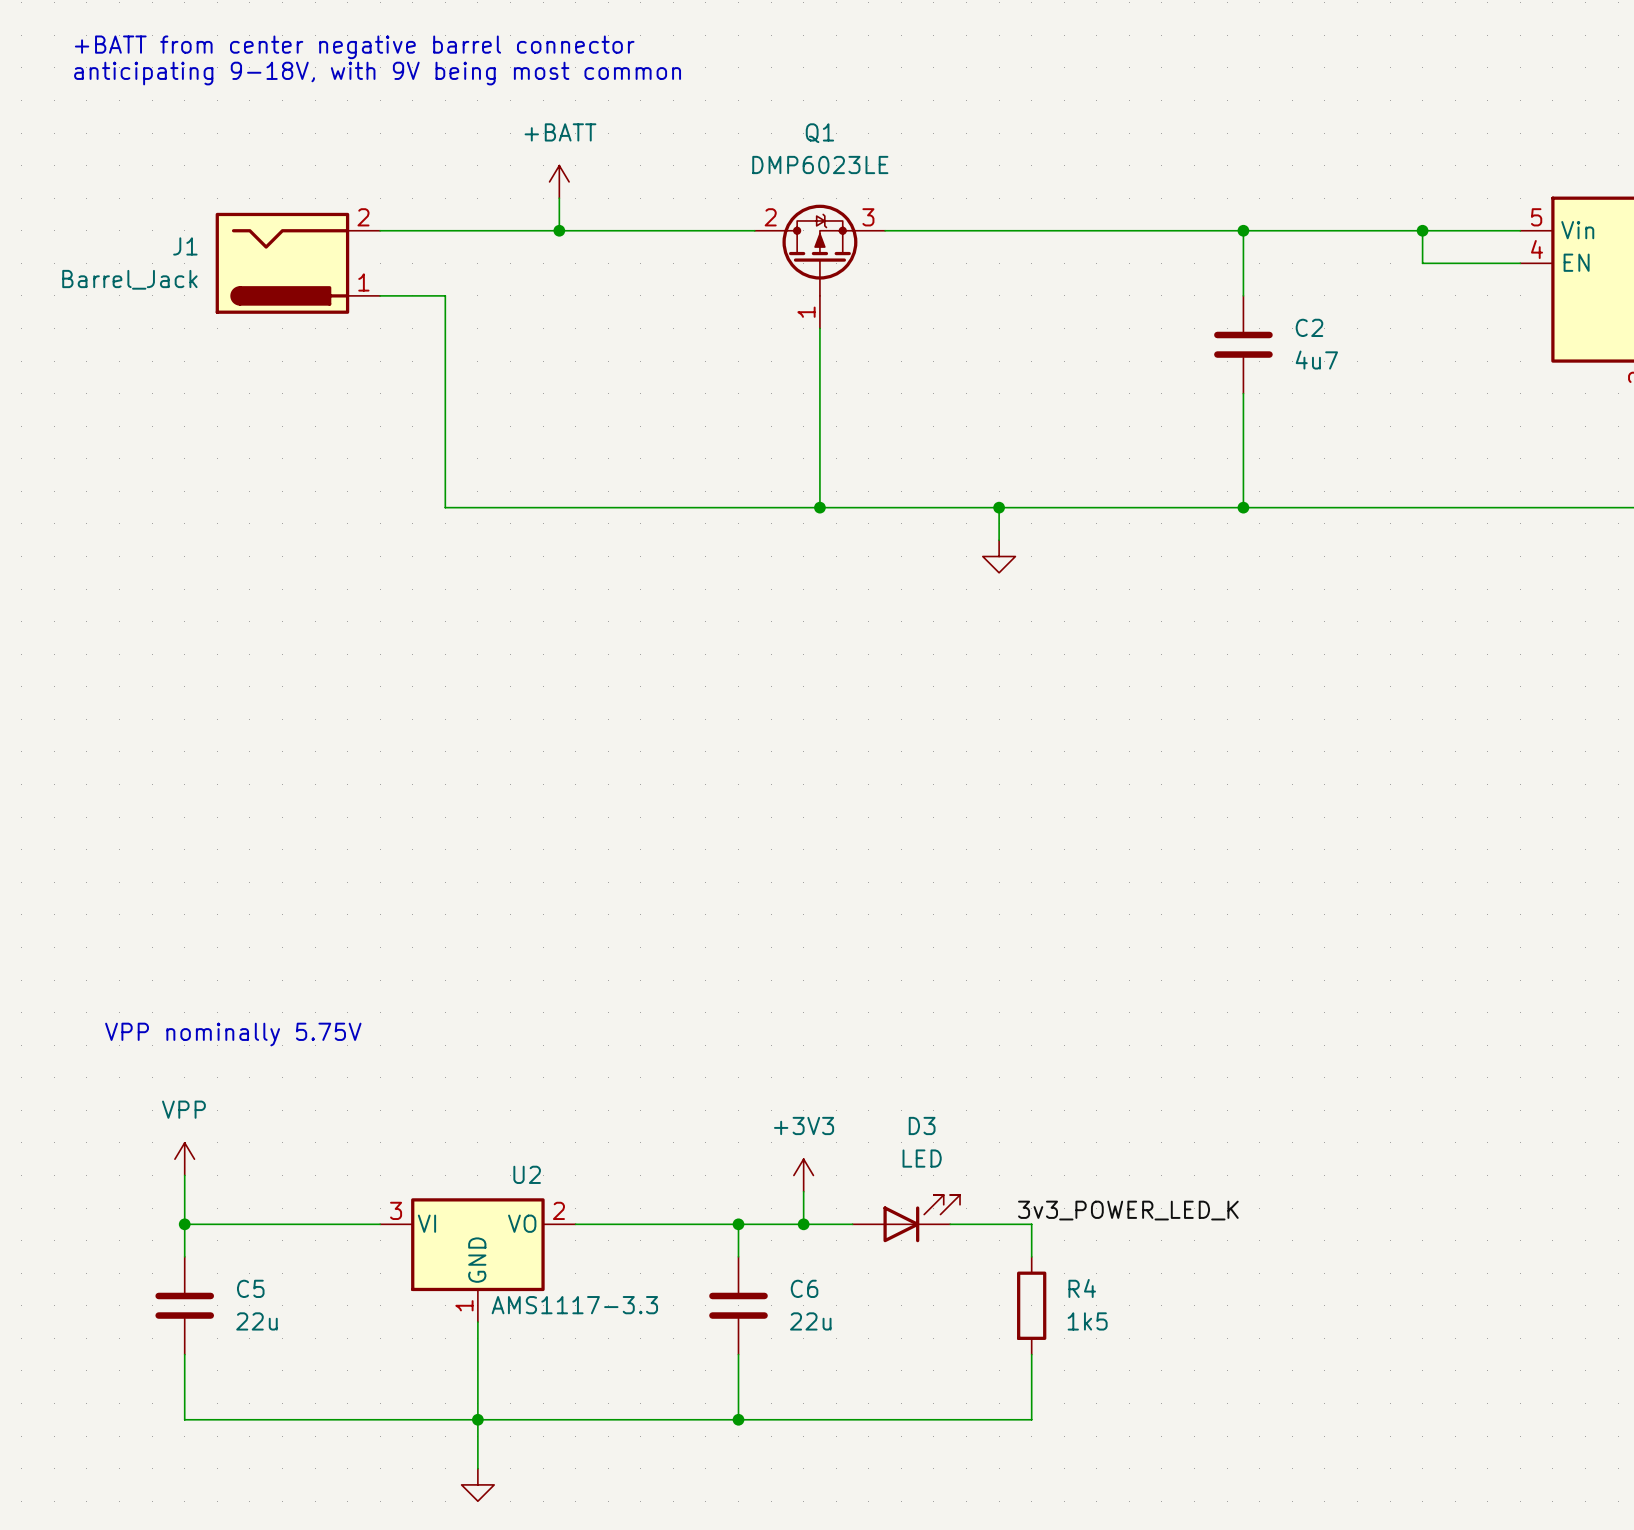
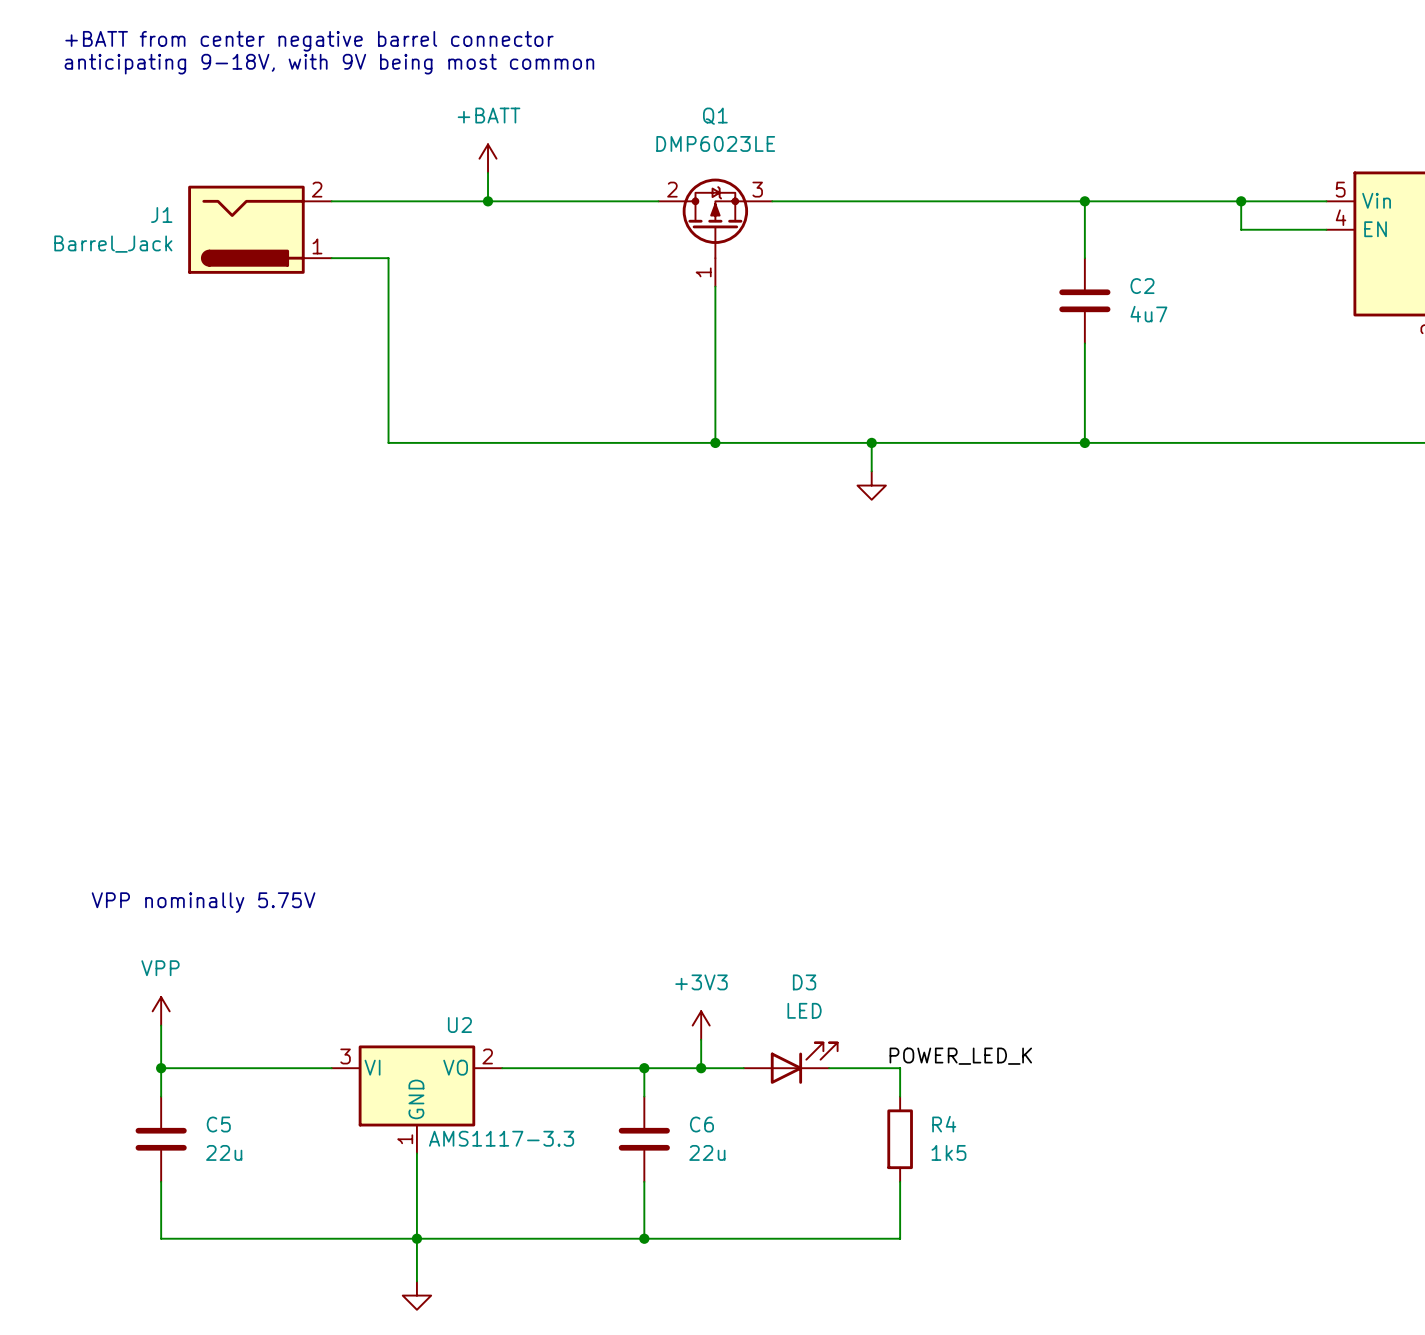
label: 3v3_POWER_LED_K (1128, 1210) -> POWER_LED_K (960, 1056)

